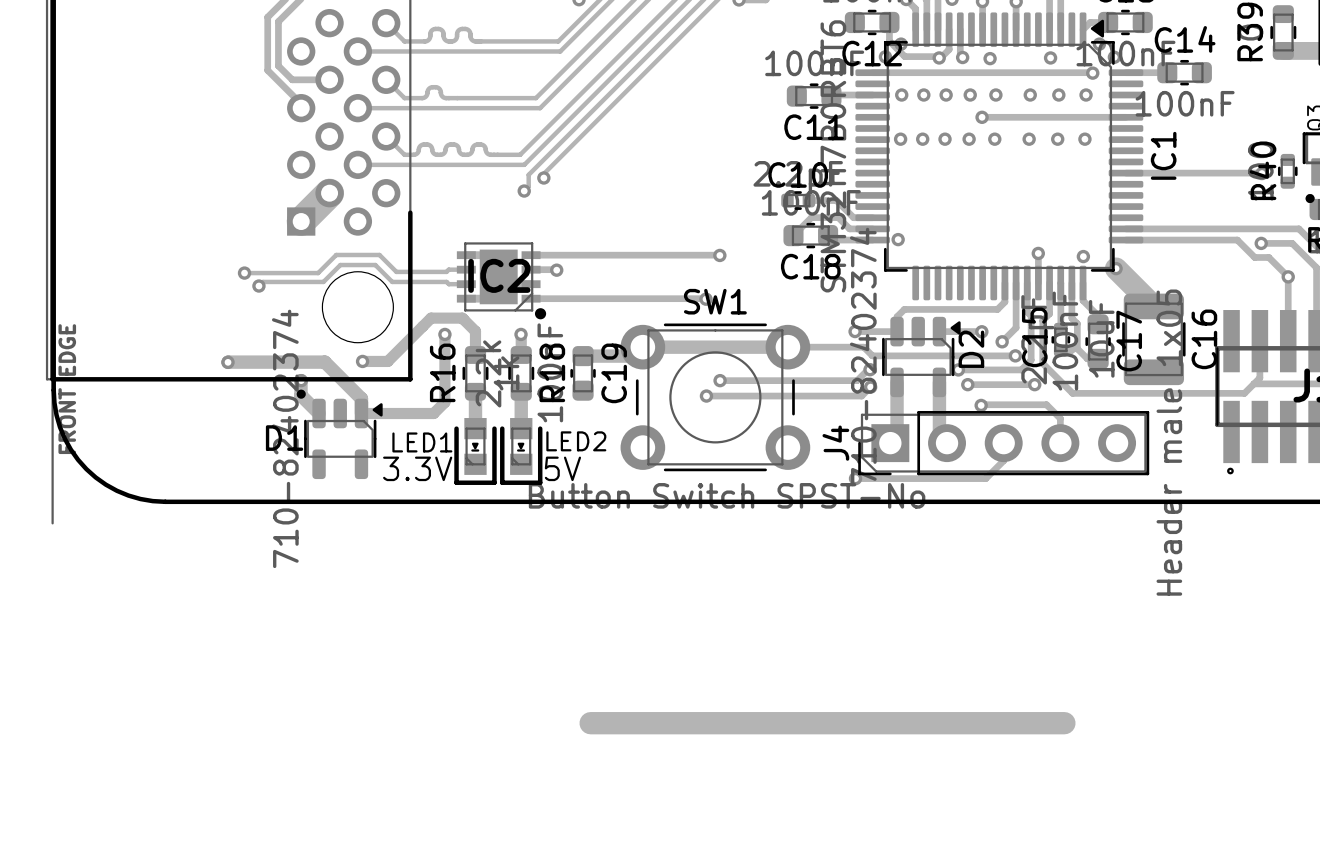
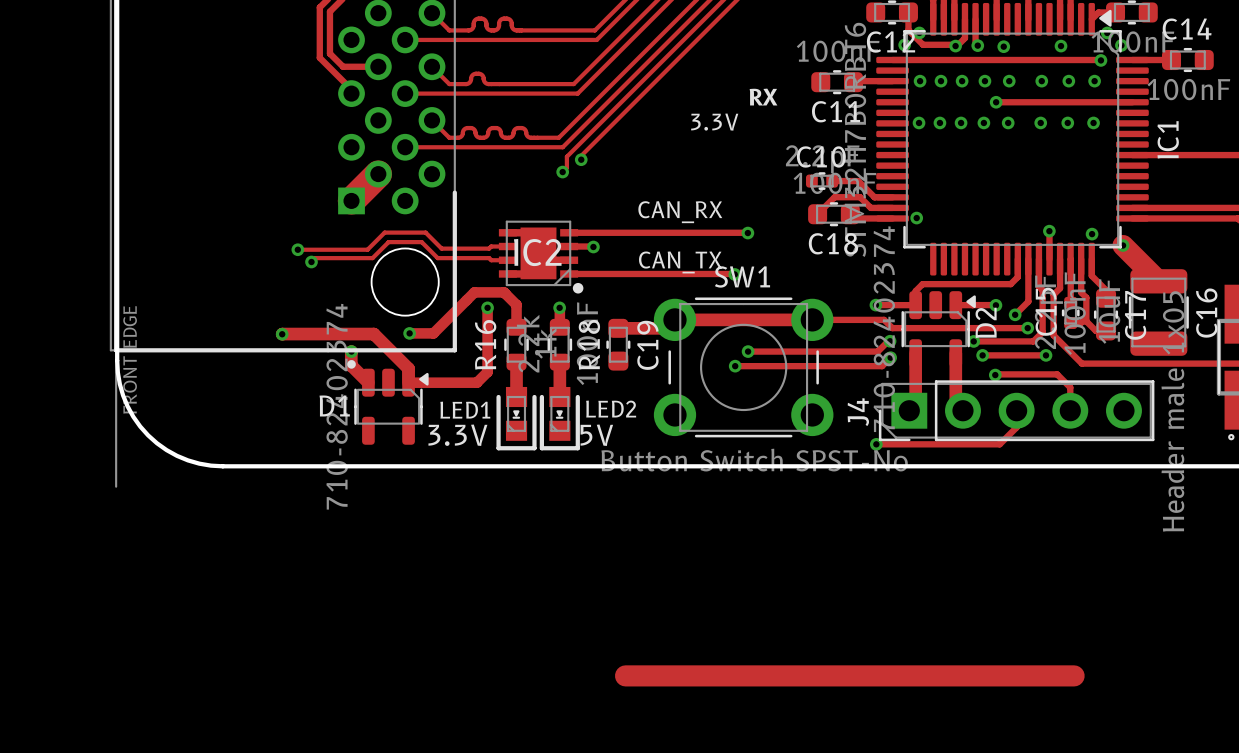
text: none -> RX (763, 97)
text: none -> 3.3V (714, 122)
text: none -> CAN_RX (680, 212)
text: none -> CAN_TX (680, 262)

